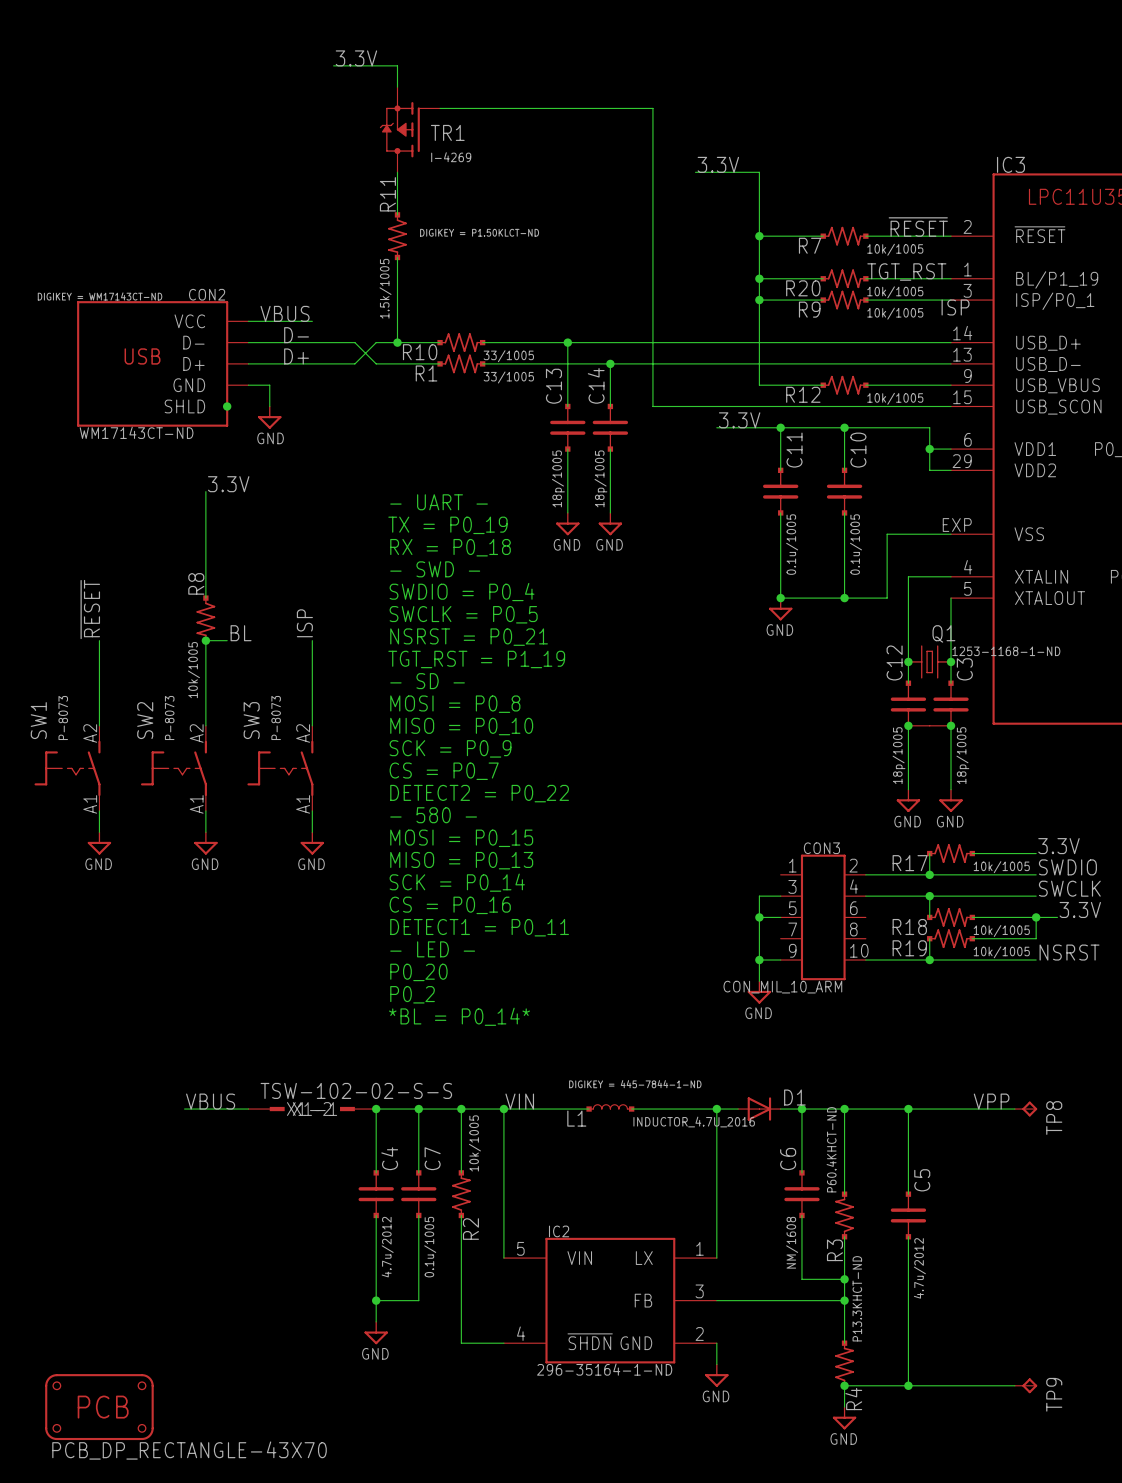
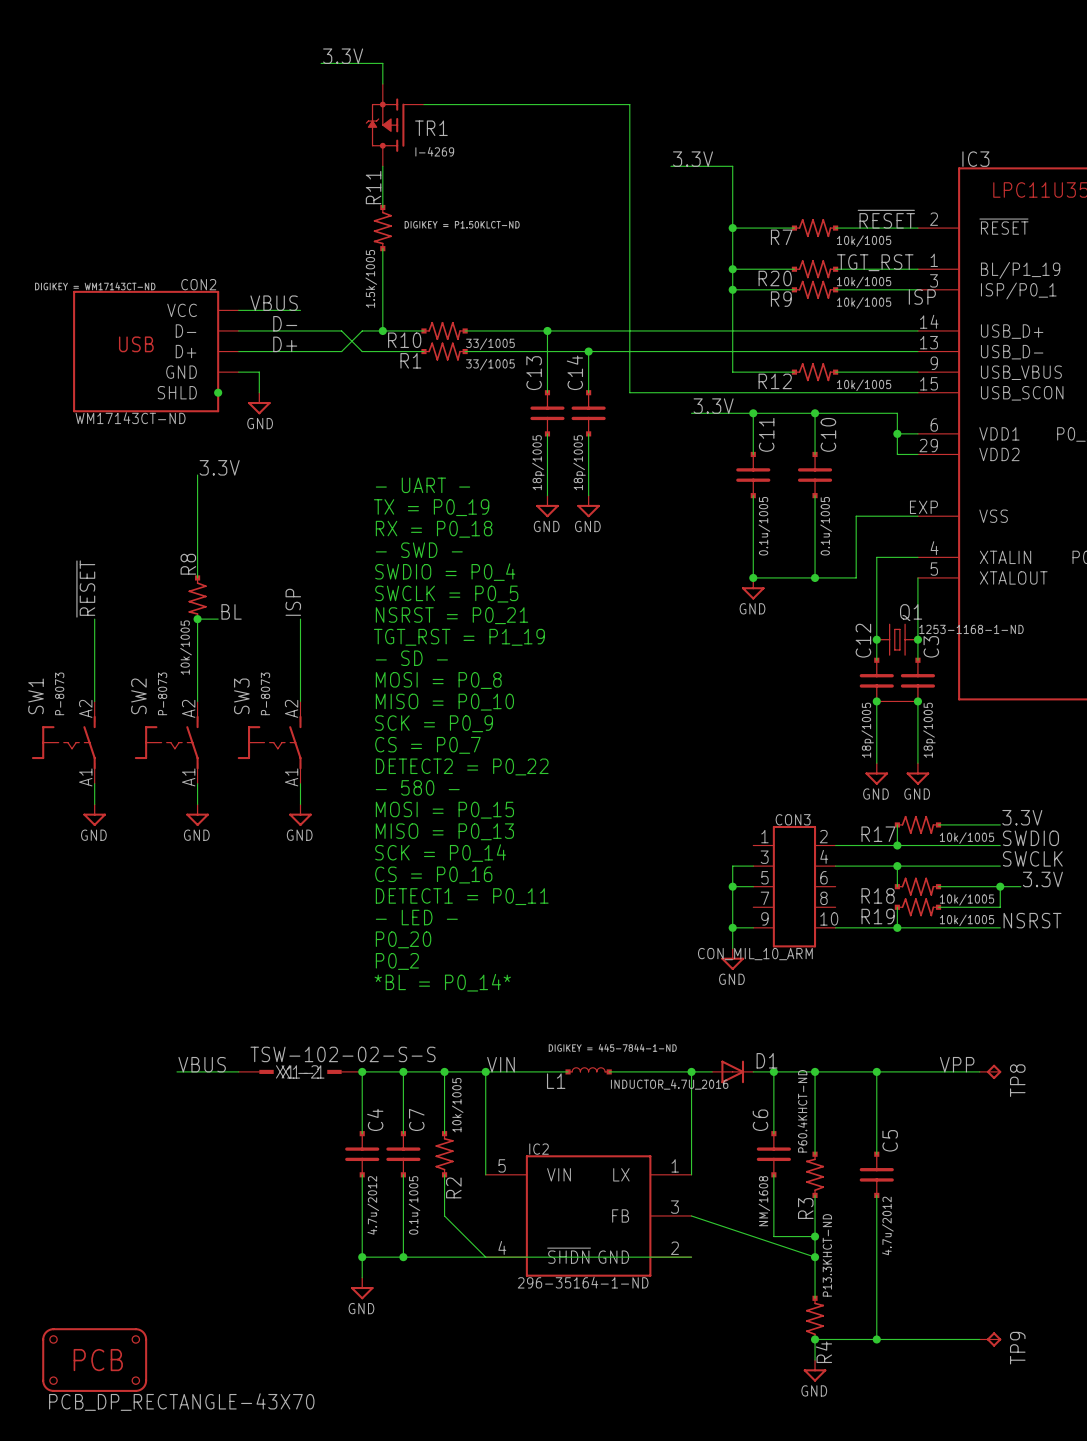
wire: (503, 1215) (503, 1258) -> none
wire: (716, 1215) (716, 1258) -> none
wire: (461, 1258) (461, 1343) (503, 1343) -> (444, 1215) (485, 1257)
wire: none -> (403, 1257) (691, 1257)
junction: none -> (403, 1257)
IC2 position: (610, 1300) -> (588, 1215)
wire: (716, 1300) (844, 1300) -> (691, 1215) (815, 1257)
wire: (716, 1343) (716, 1364) -> none
power symbol: GND (716, 1375) -> none

